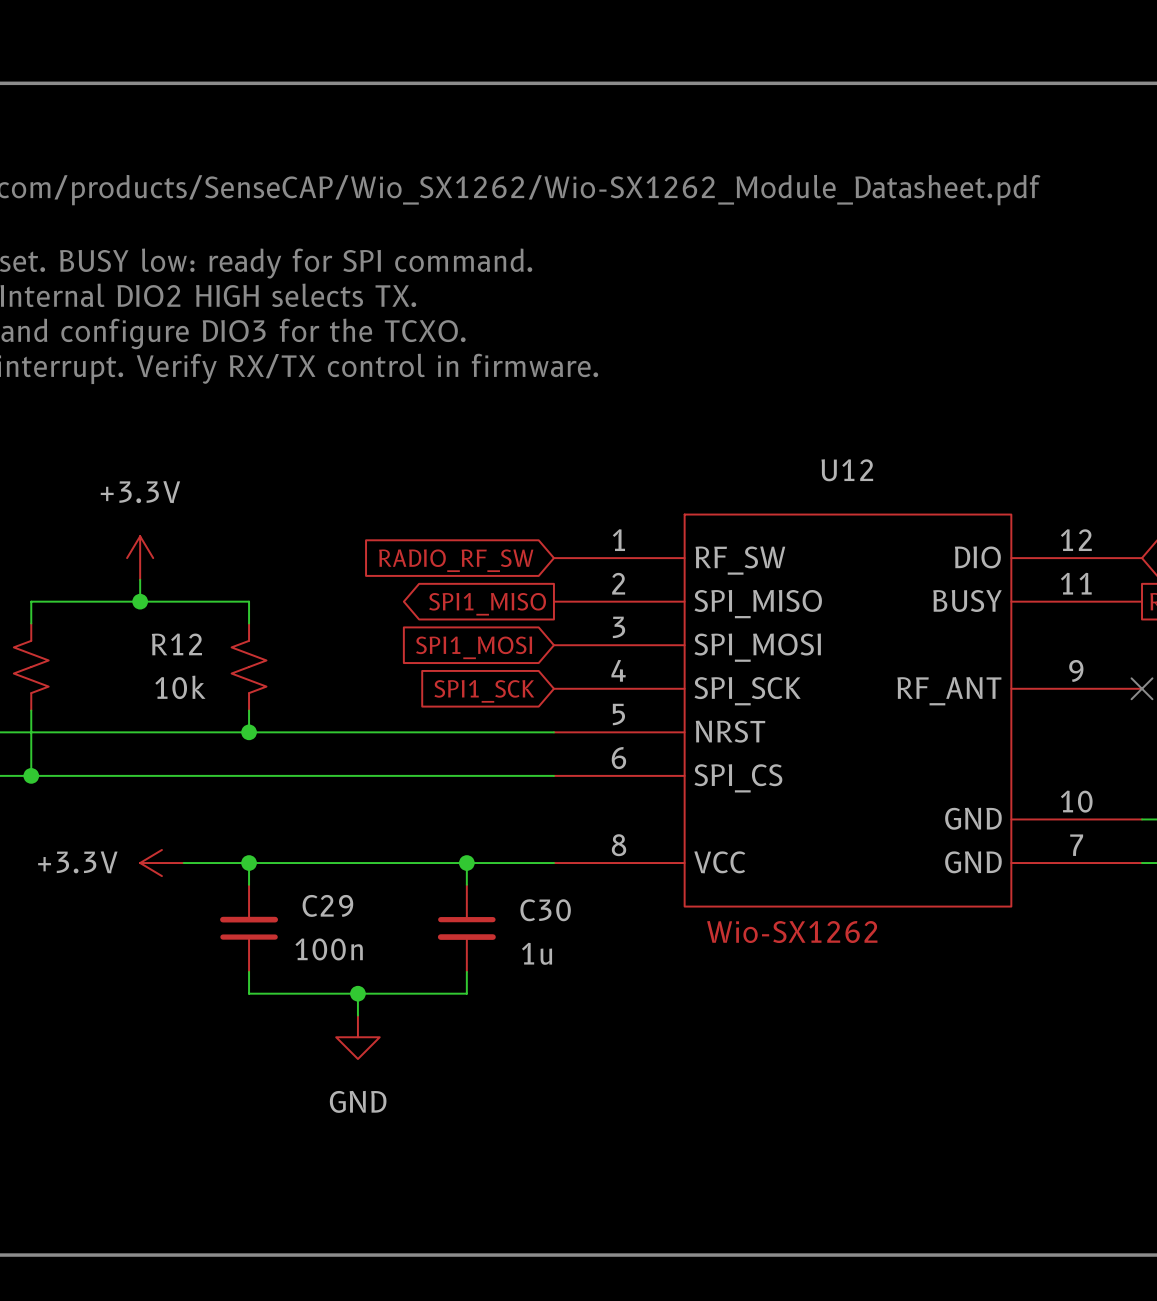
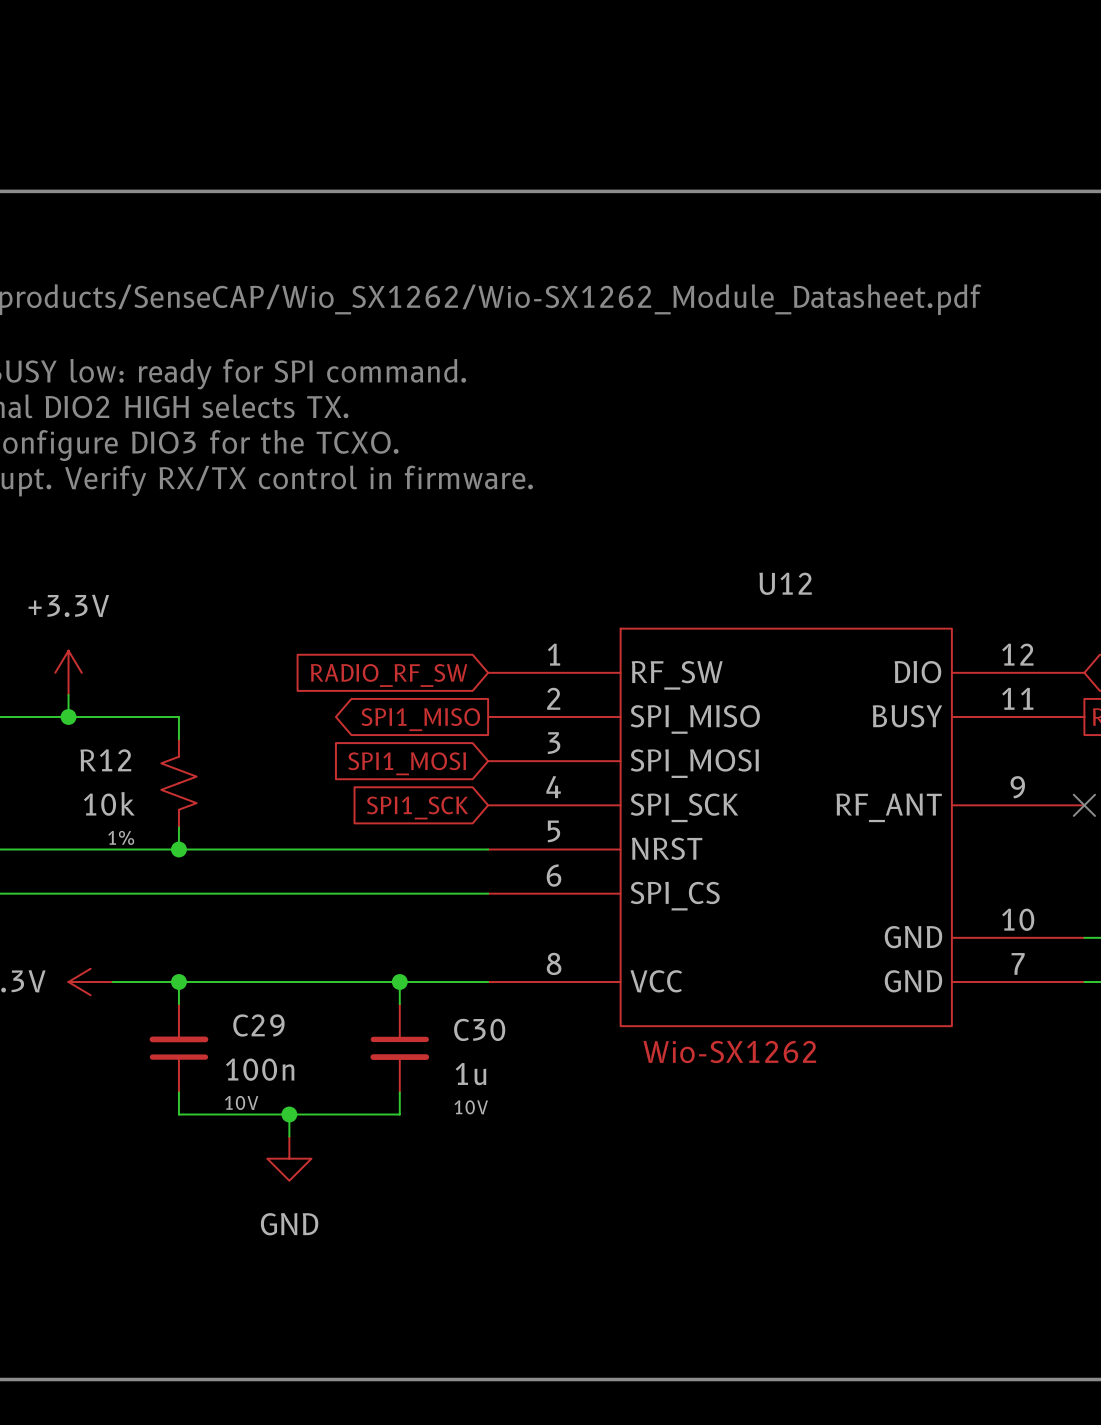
R12 text: none -> 1% (121, 837)
C29 text: none -> 10V (241, 1102)
C30 text: none -> 10V (471, 1107)

